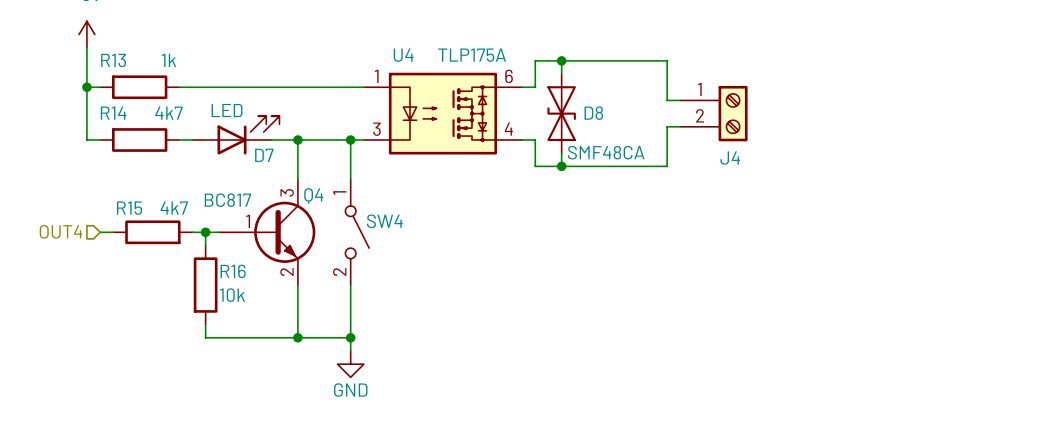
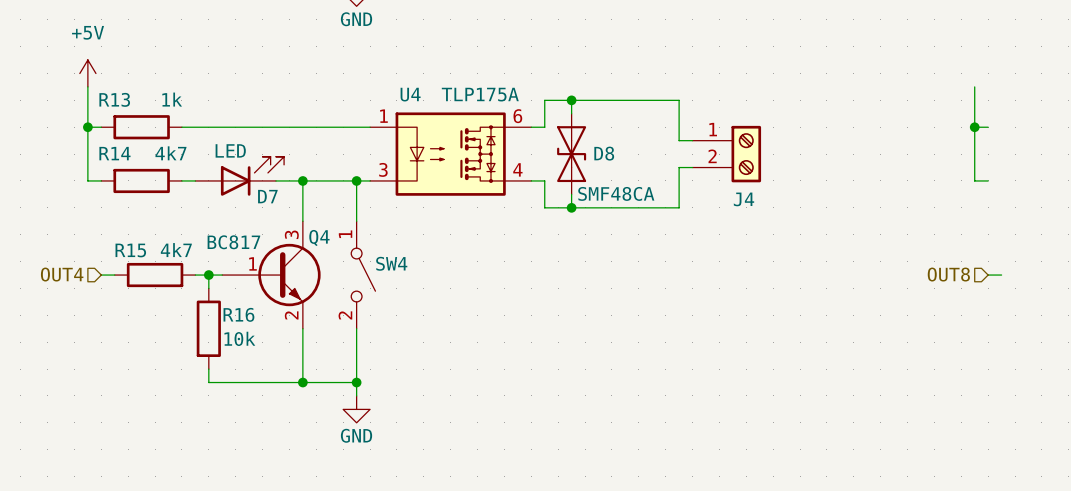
wire: none -> (974, 86) (974, 180) (988, 180)
wire: none -> (974, 127) (988, 127)
junction: none -> (974, 127)
hierarchical label: none -> OUT8 (948, 274)
wire: none -> (988, 275) (1001, 275)

